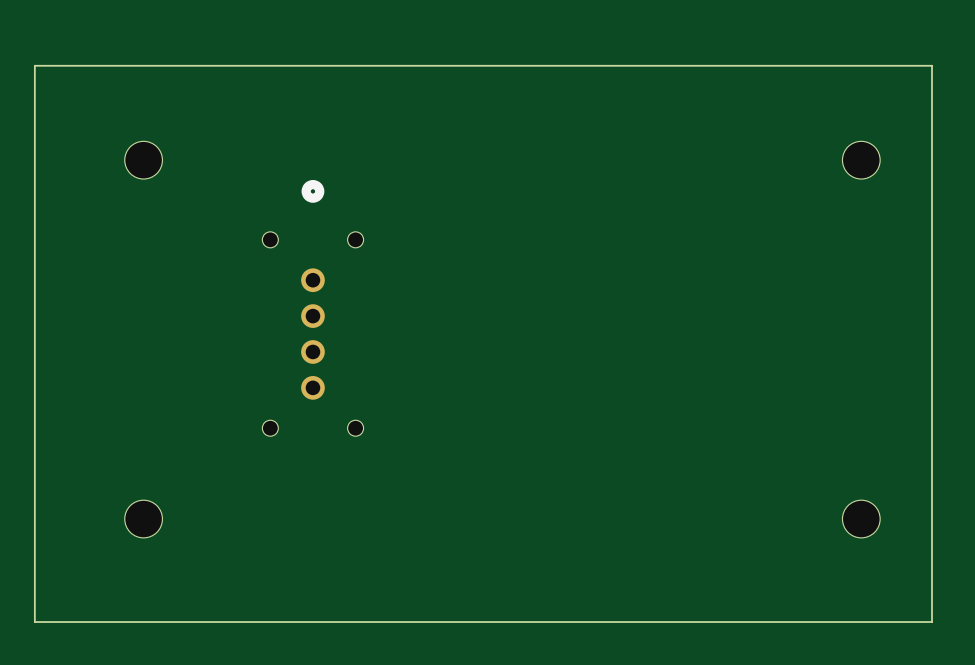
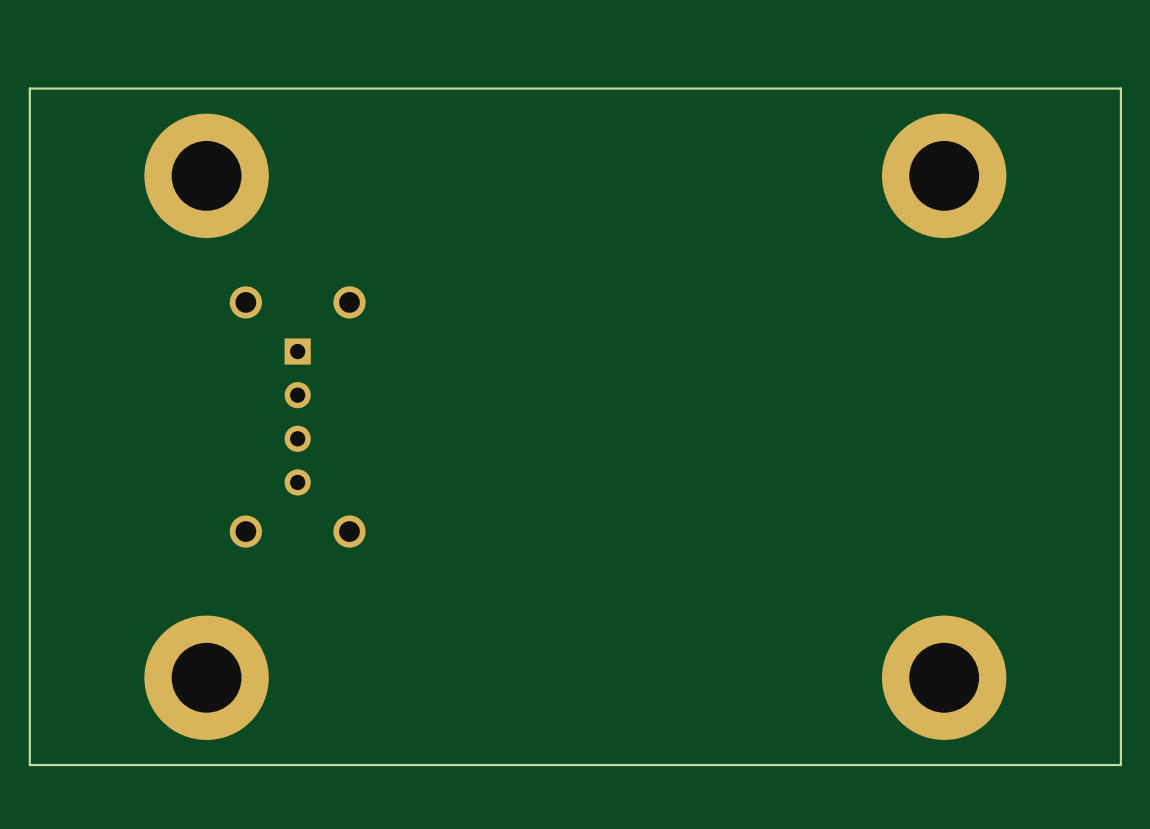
part: none -> (206, 175)
part: none -> (944, 175)
part: (143, 160) -> none
part: (861, 160) -> none
part: (312, 308) -> none
part: none -> (297, 416)
part: (143, 519) -> none
part: (861, 519) -> none
part: none -> (206, 677)
part: none -> (944, 677)

